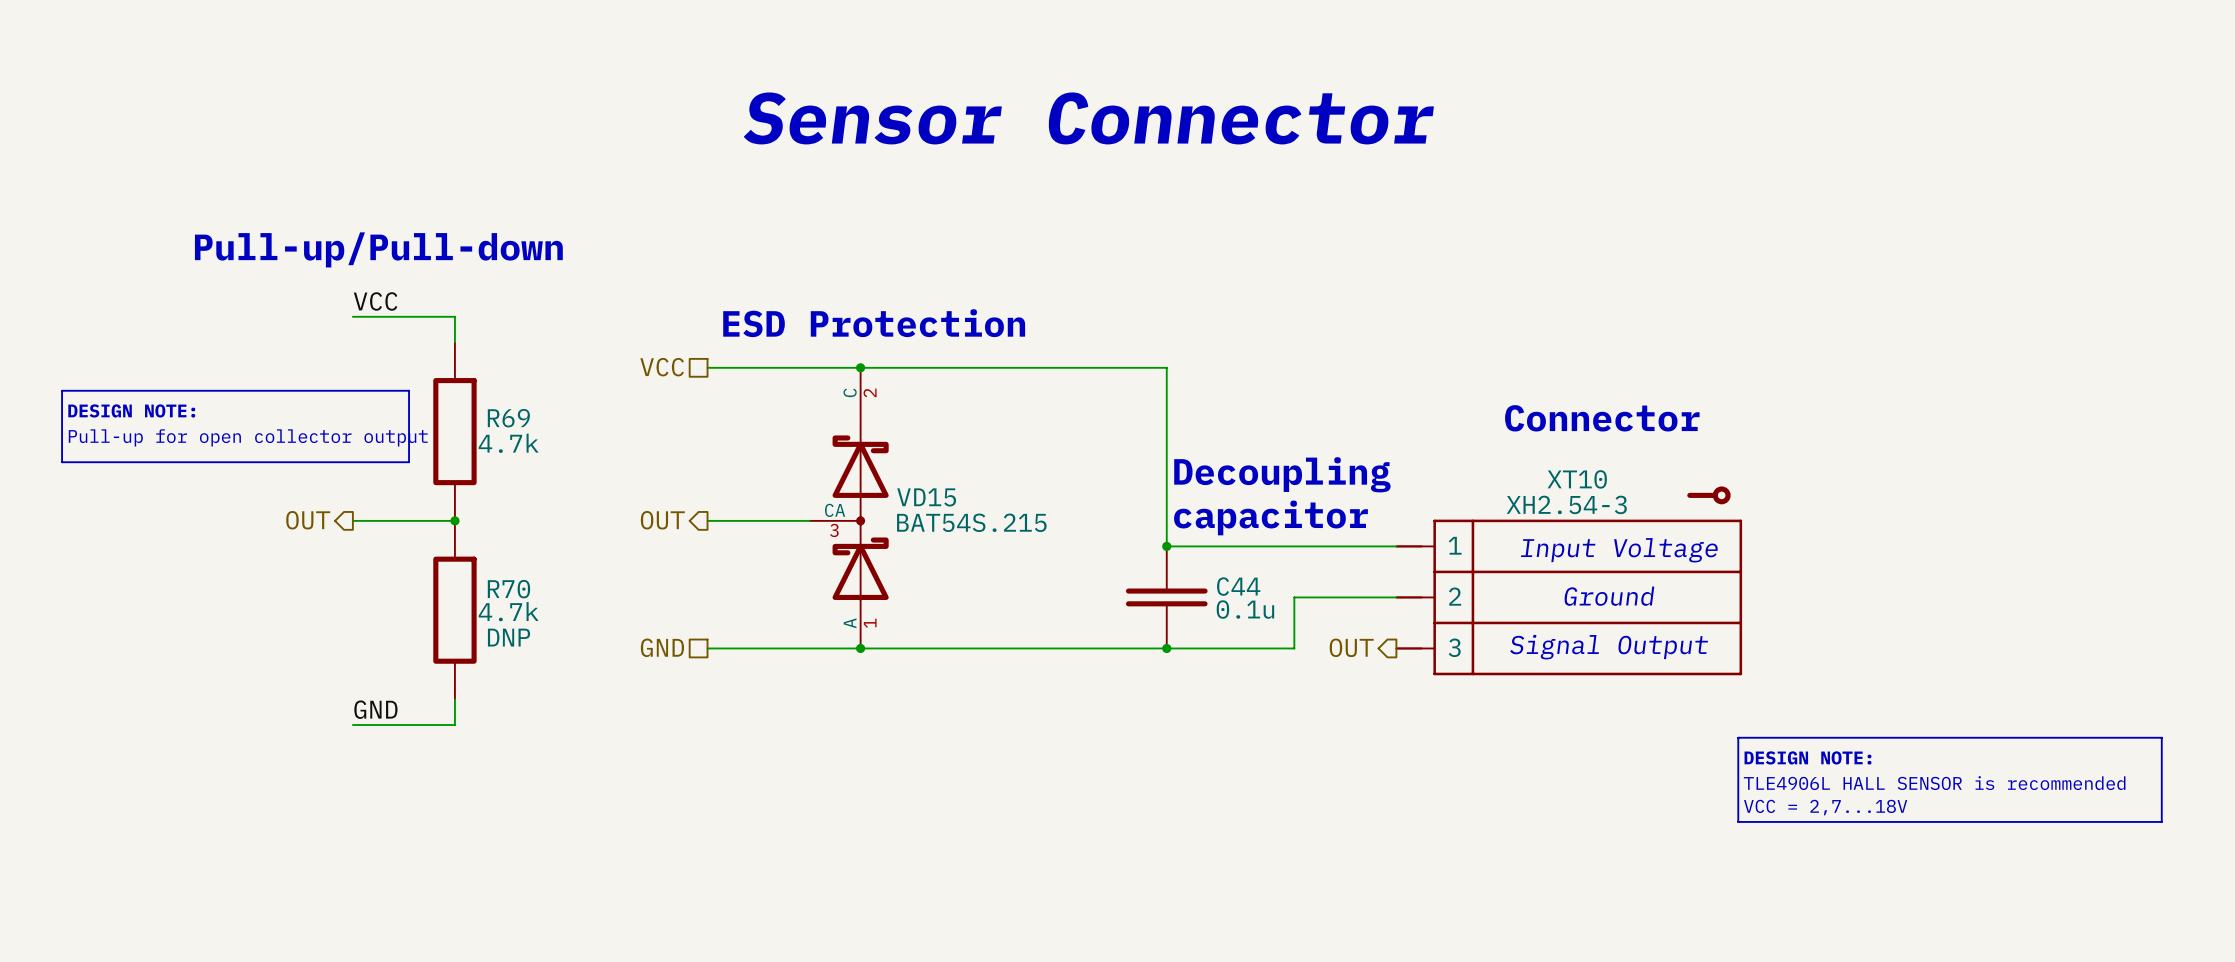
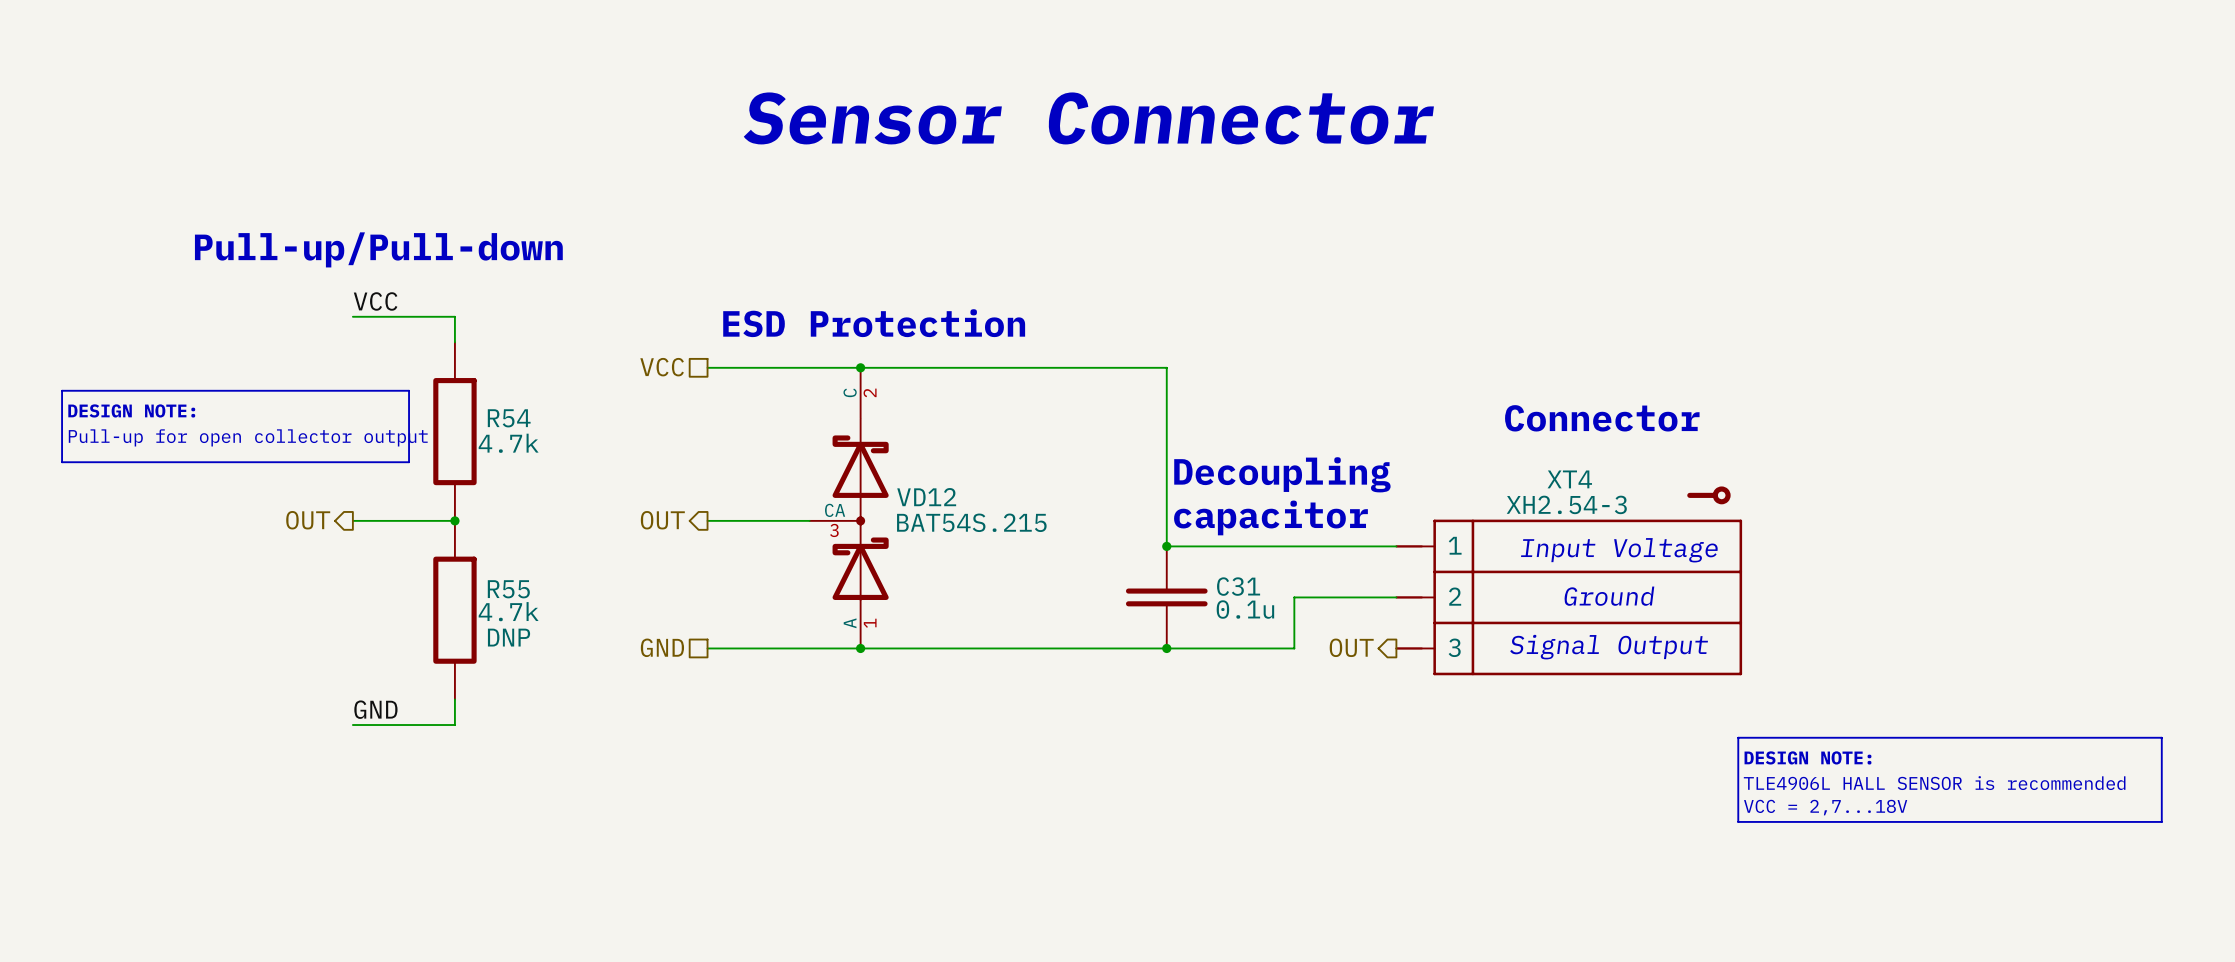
R69 name: R69 (508, 418) -> R54 (509, 418)
XT10 name: XT10 (1577, 479) -> XT4 (1569, 479)
VD15 name: VD15 (926, 497) -> VD12 (926, 497)
C44 name: C44 (1238, 586) -> C31 (1238, 586)
R70 name: R70 (508, 589) -> R55 (508, 589)

